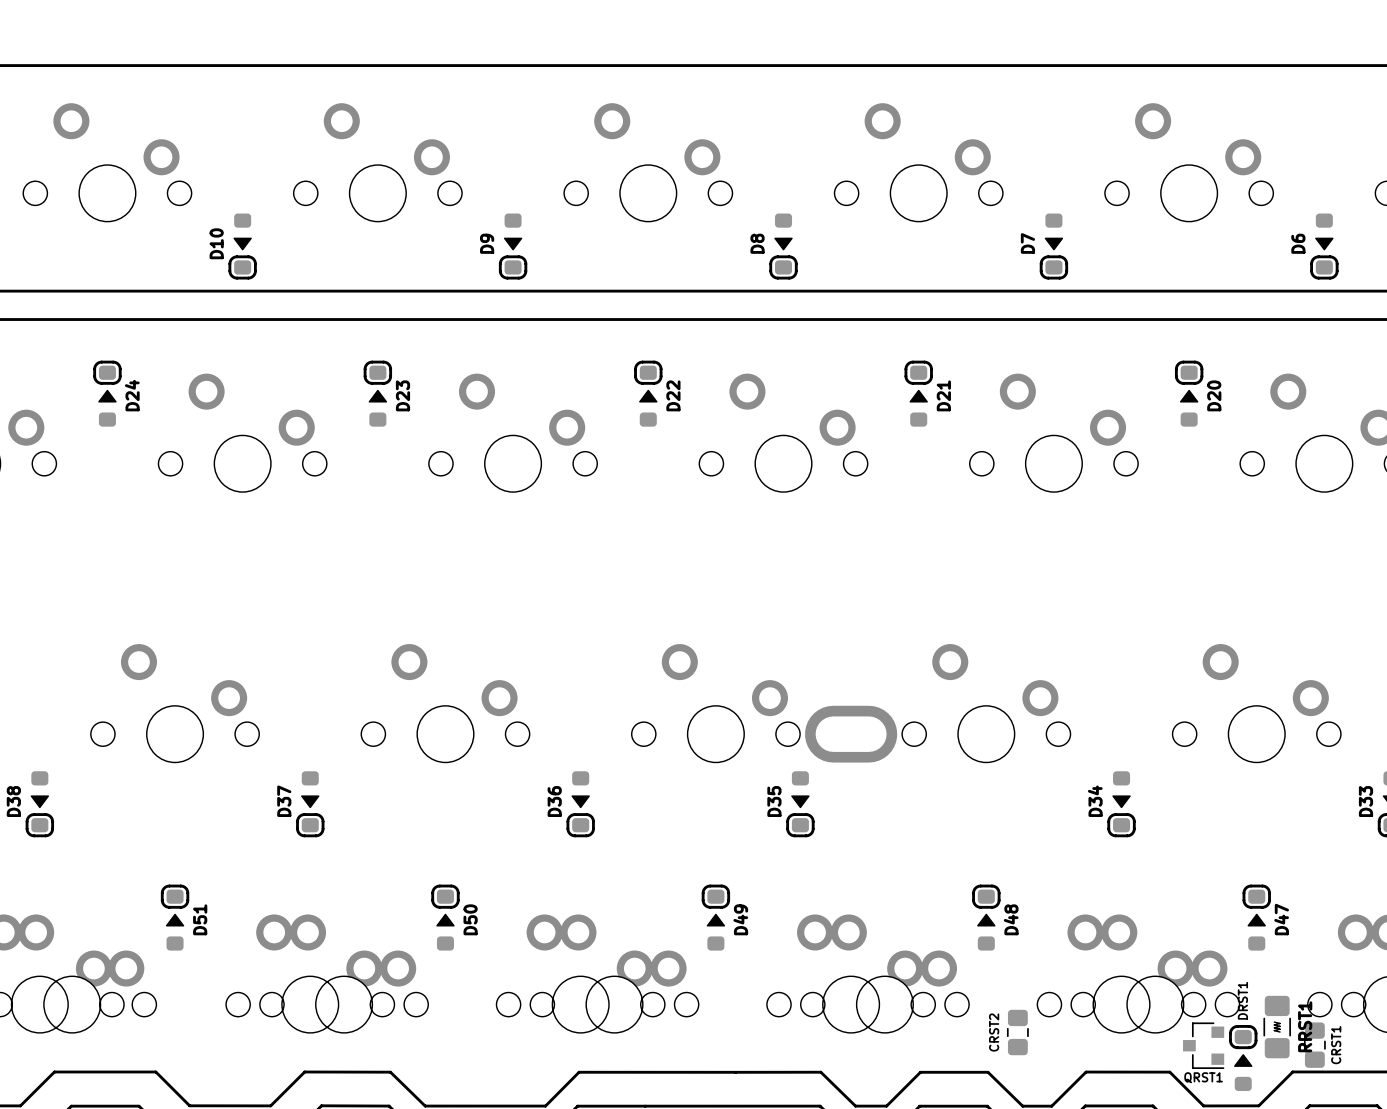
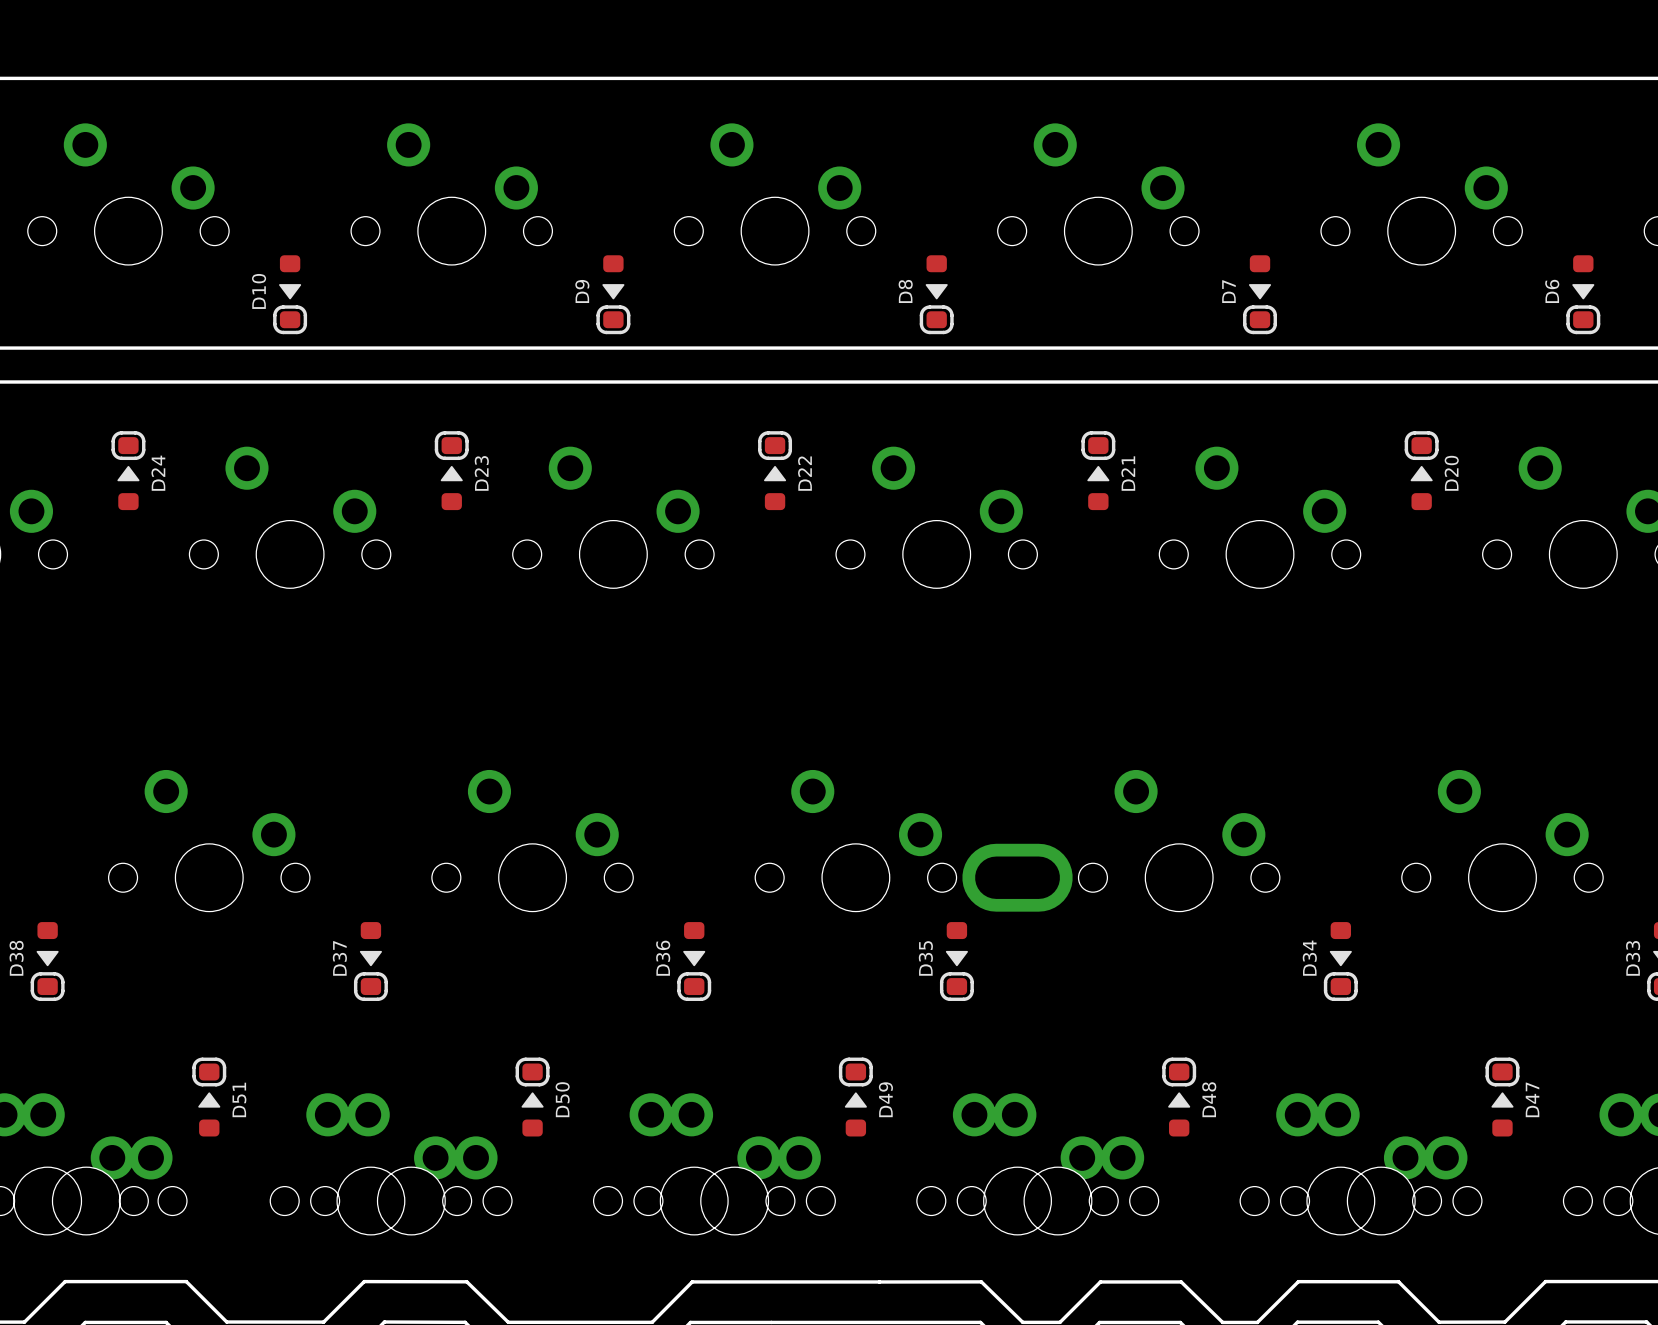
RRST1: (1277, 1027) -> none
CRST2: (1017, 1032) -> none
QRST1: (1203, 1045) -> none
CRST1: (1314, 1045) -> none
DRST1: (1243, 1058) -> none

